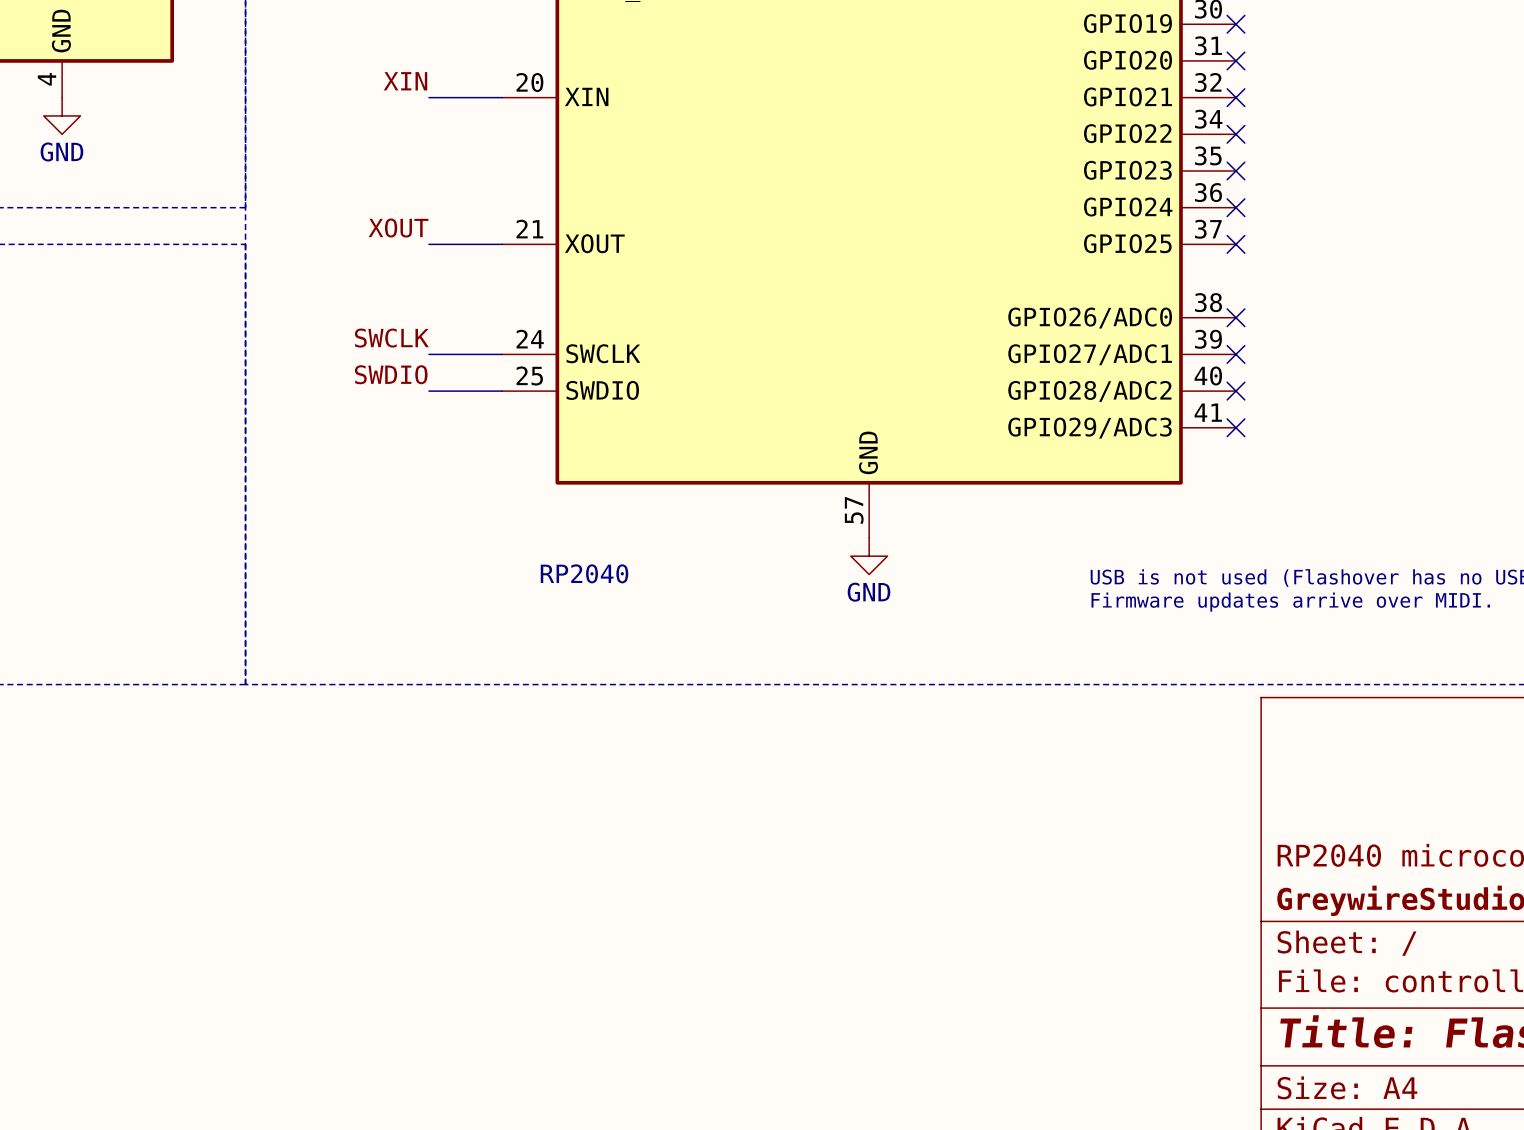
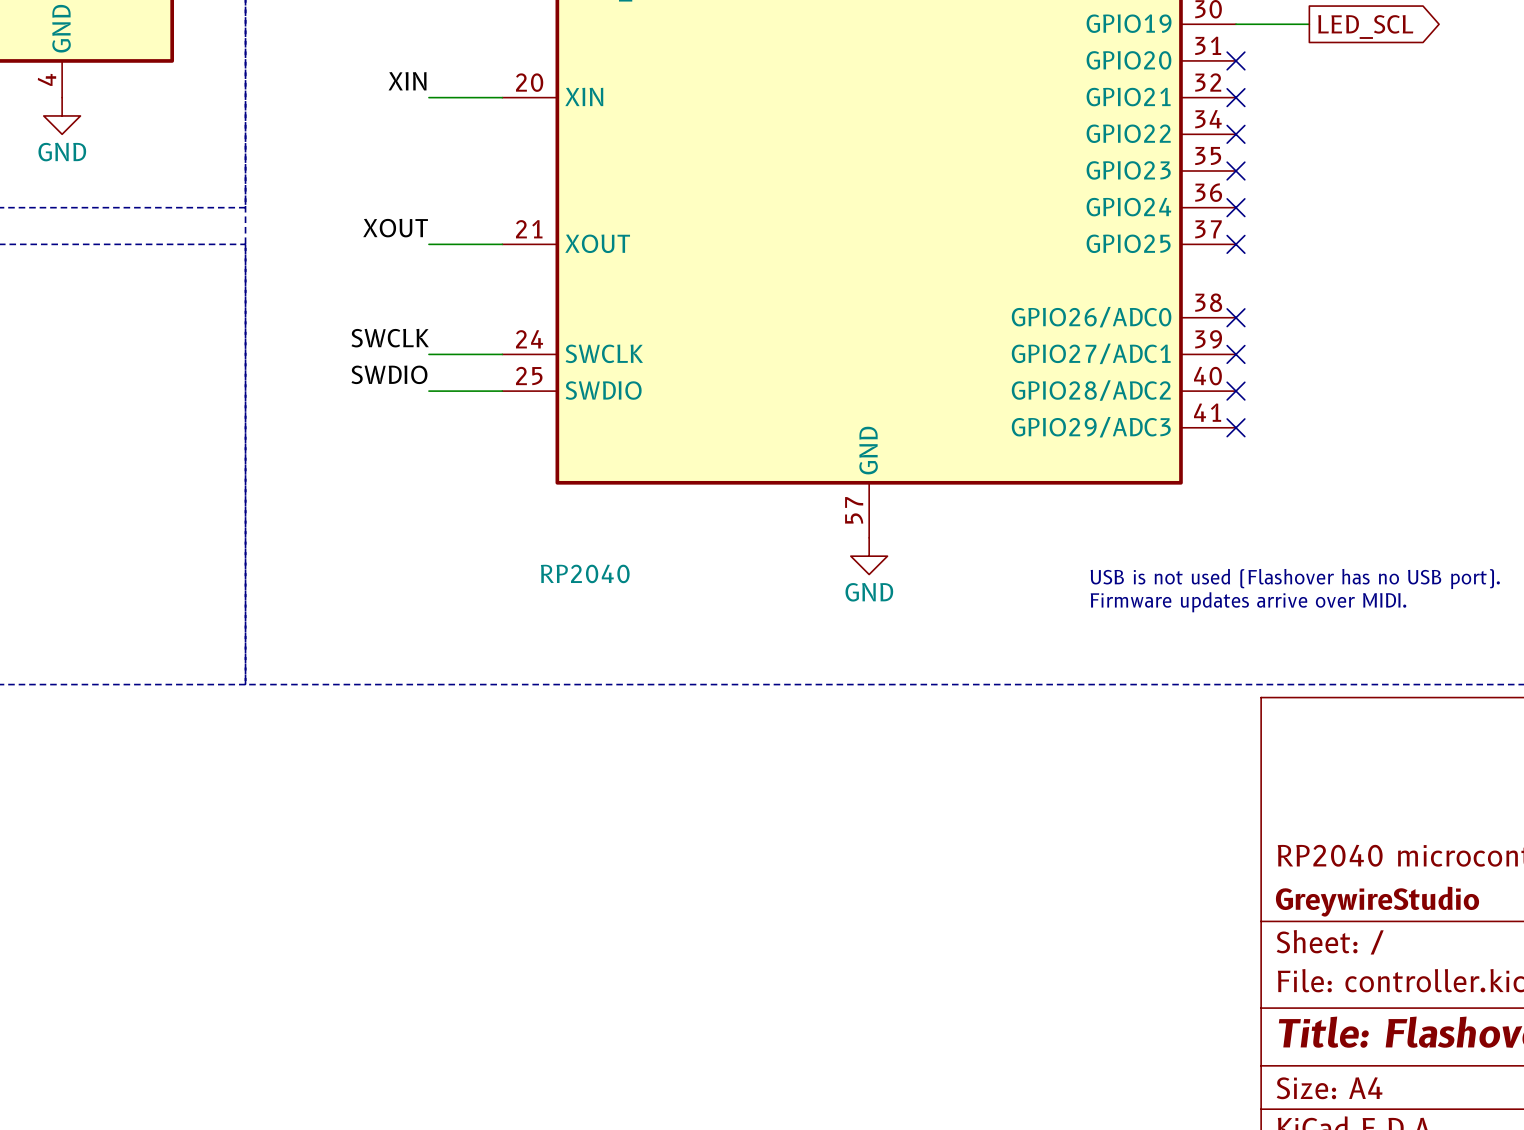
wire: none -> (1235, 24) (1309, 24)
no-connect mark: (1235, 24) -> none
global label: none -> LED_SCL (1365, 27)

